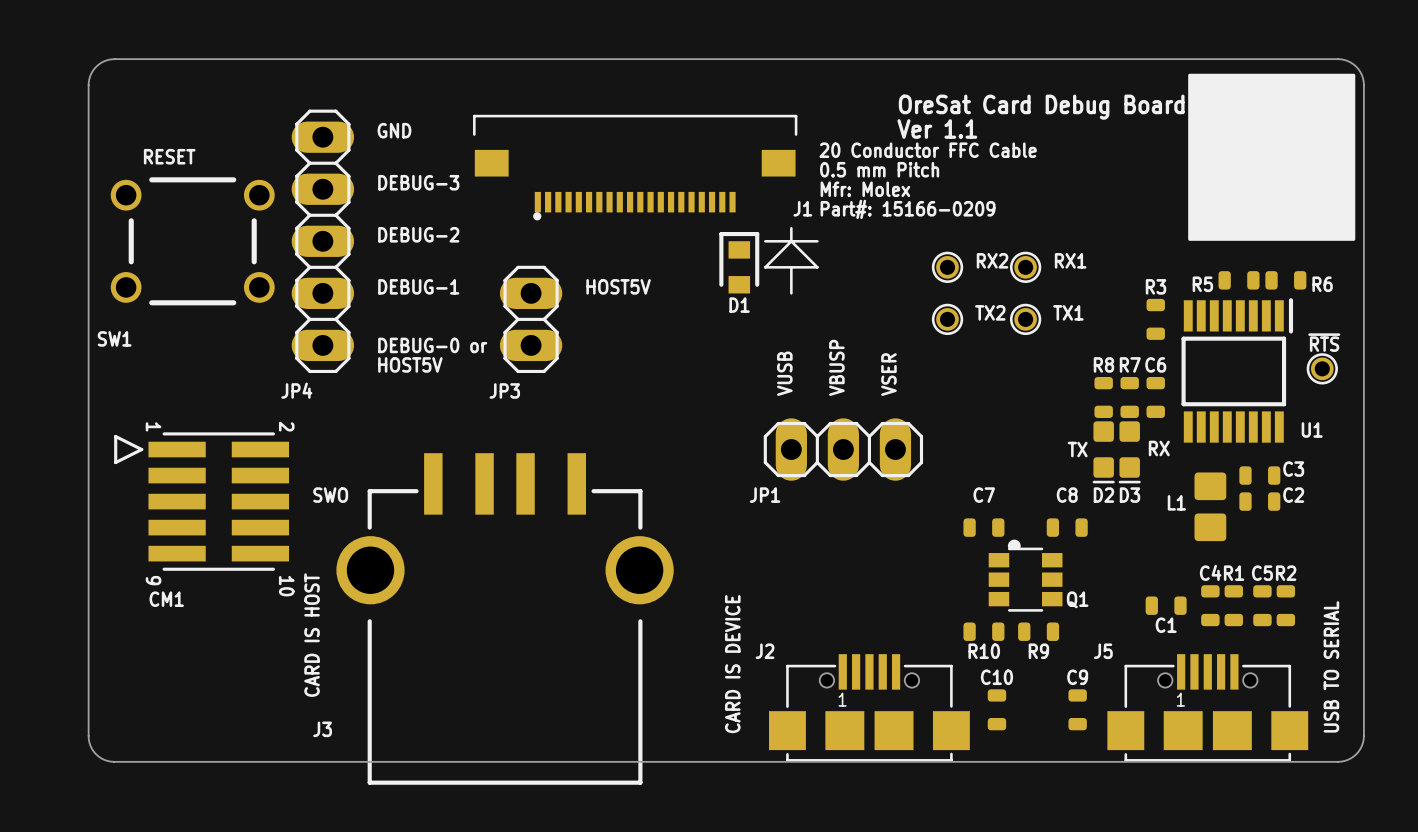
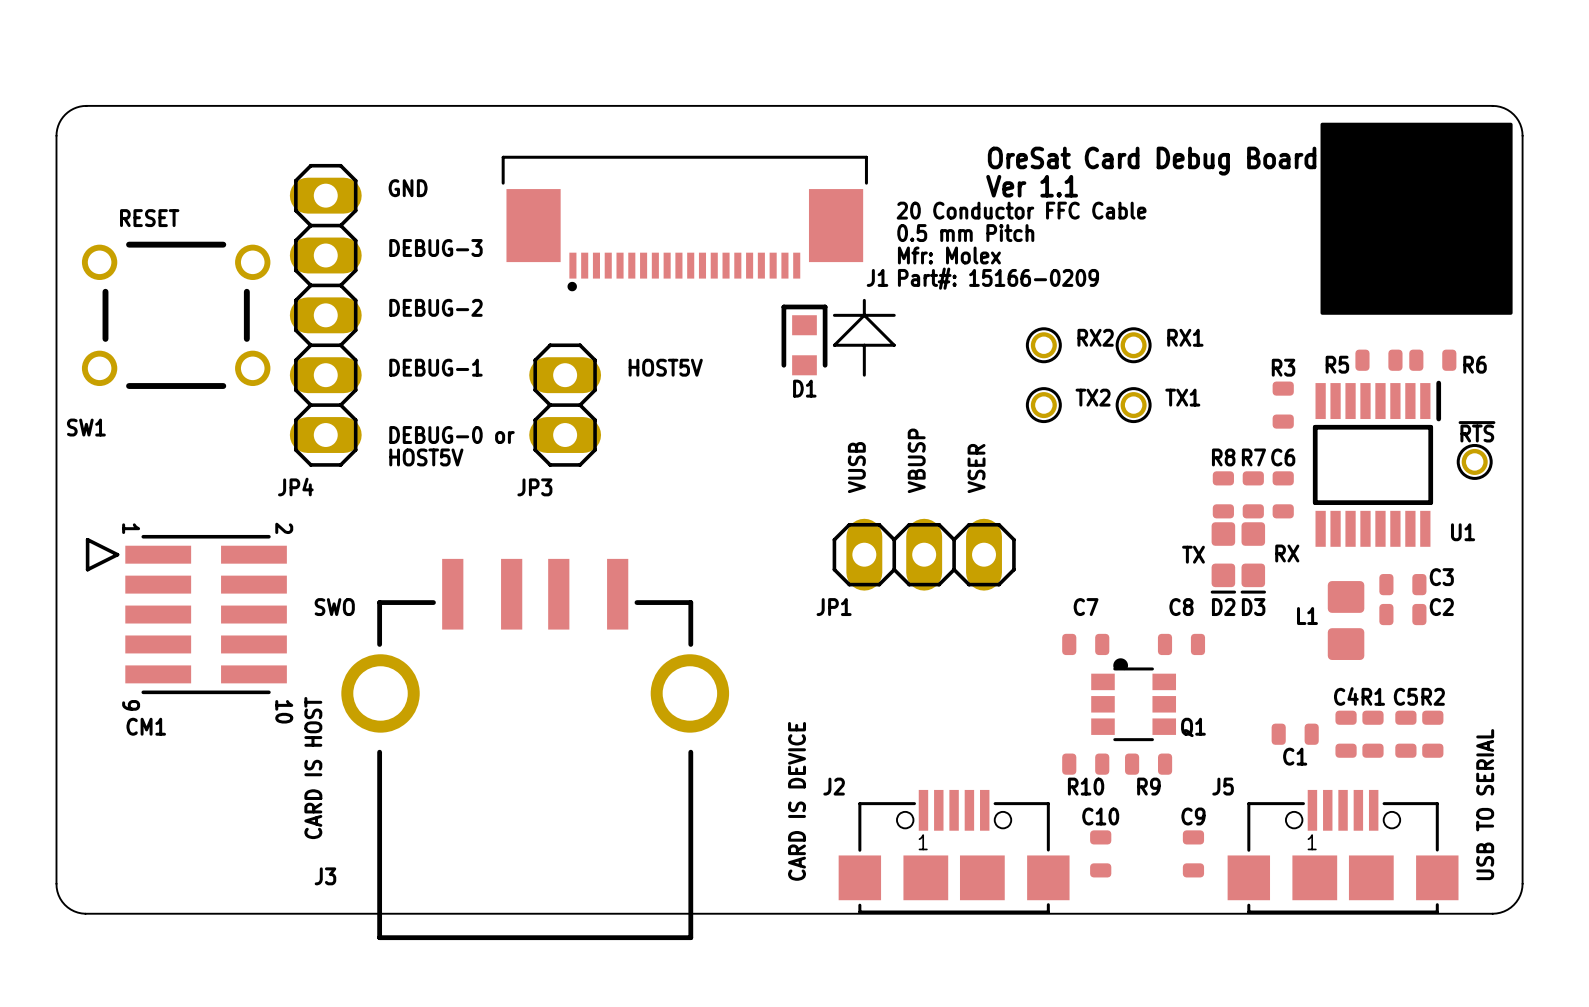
J1 footprint: [473, 114, 798, 221] -> [501, 155, 868, 292]

